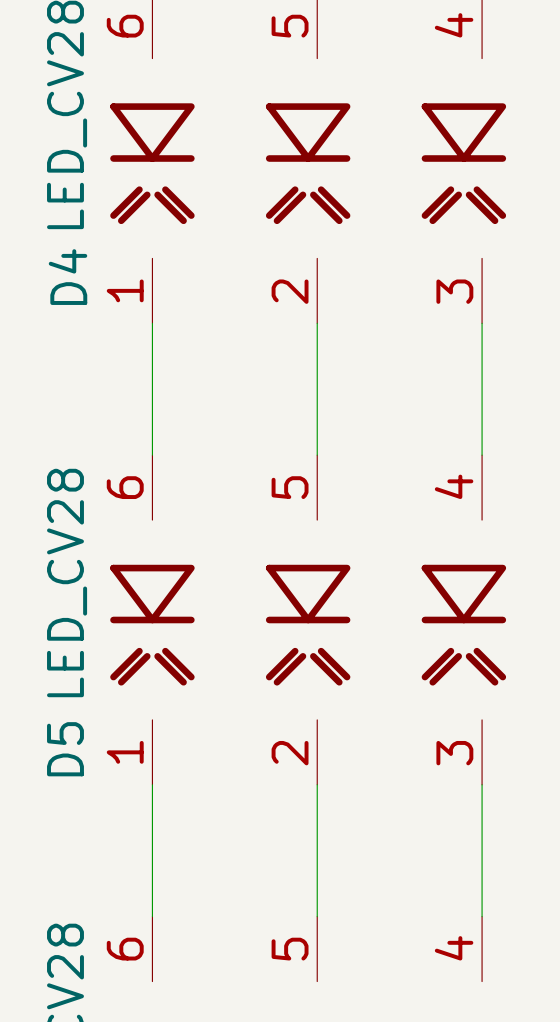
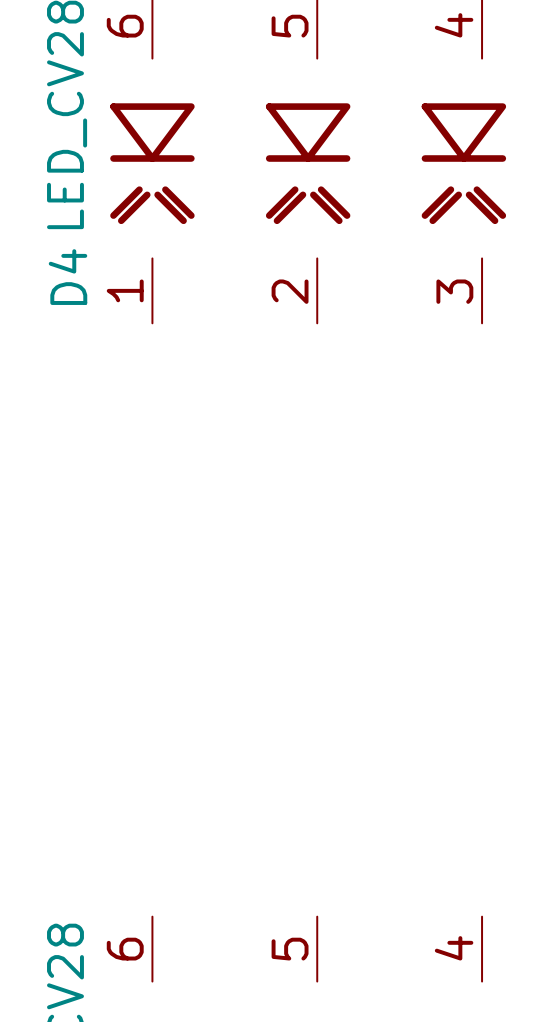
wire: (152, 323) (152, 455) -> none
wire: (317, 323) (317, 455) -> none
wire: (482, 323) (482, 455) -> none
D5: LED_CV28 (308, 619) -> none
wire: (152, 784) (152, 916) -> none
wire: (317, 784) (317, 916) -> none
wire: (482, 784) (482, 916) -> none

